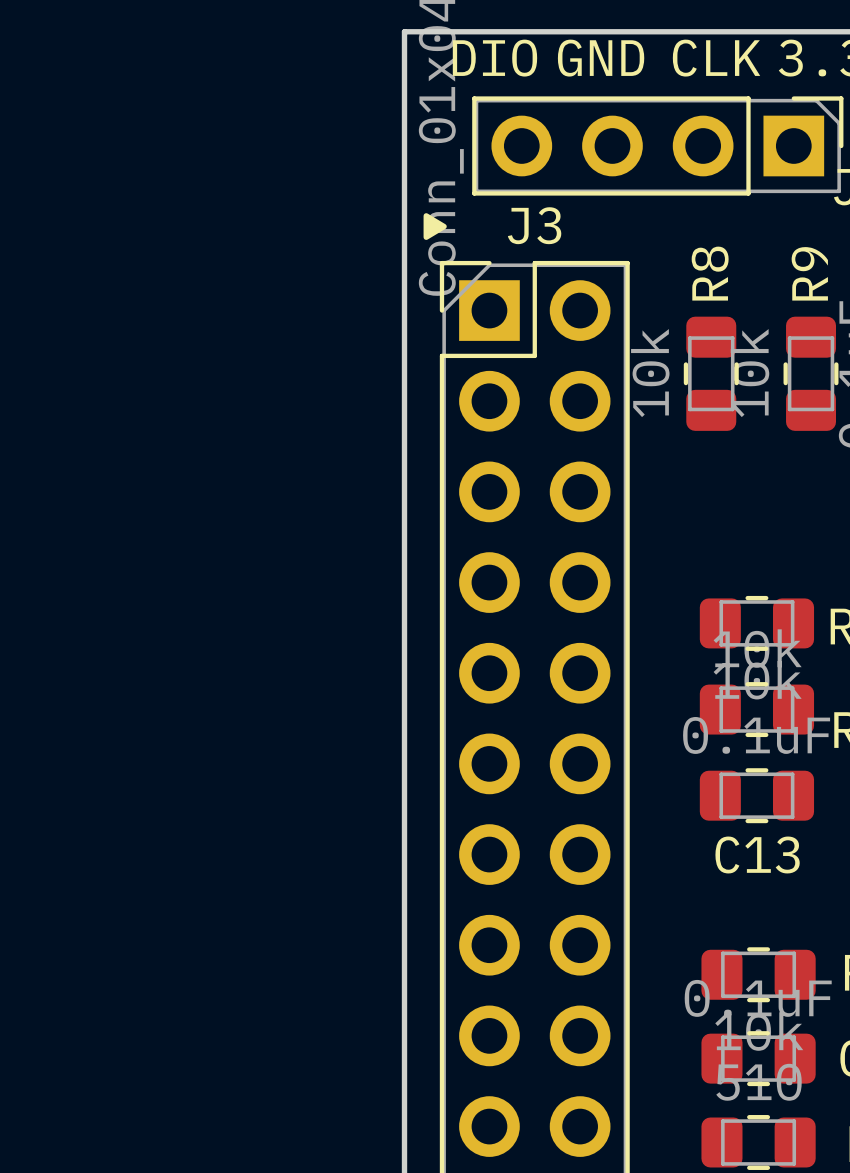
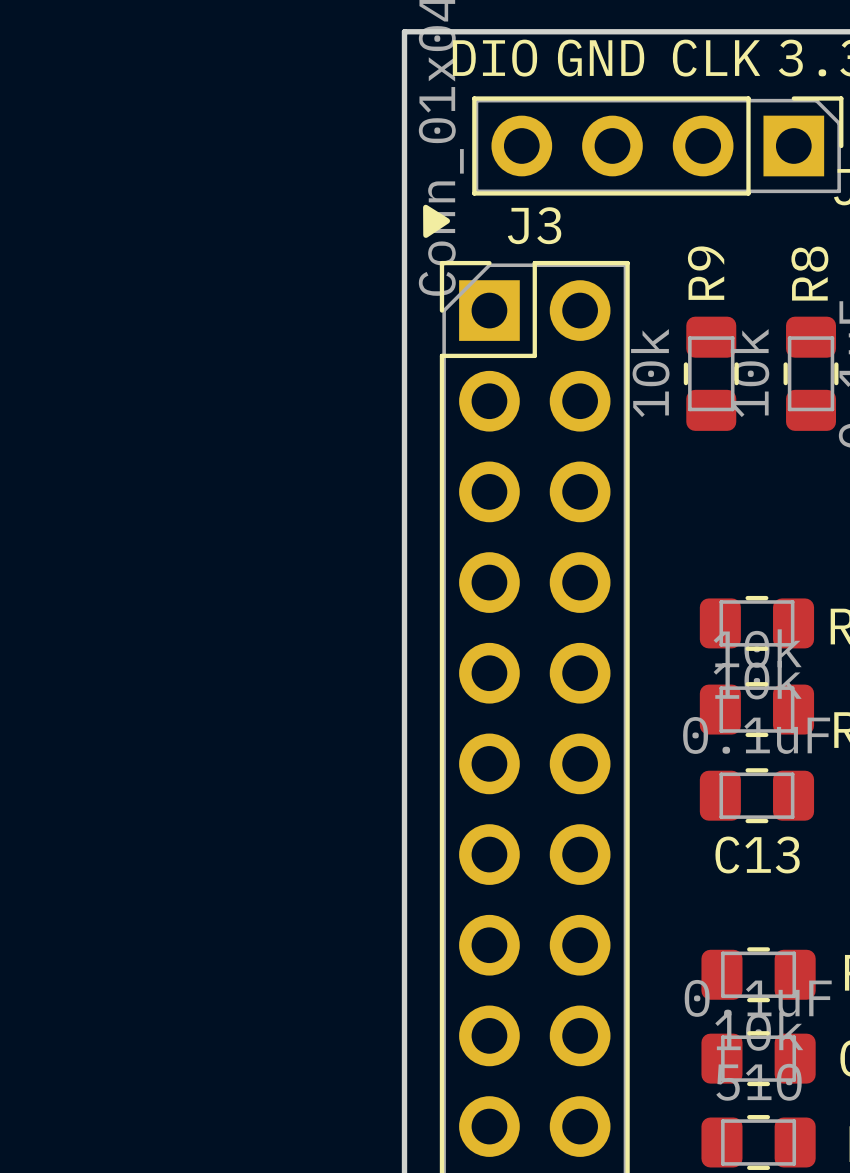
drawing shape: [423, 213, 447, 240] -> [423, 204, 451, 238]
R8 name: R8 (710, 273) -> R9 (706, 273)
R9 name: R9 (809, 273) -> R8 (809, 273)

